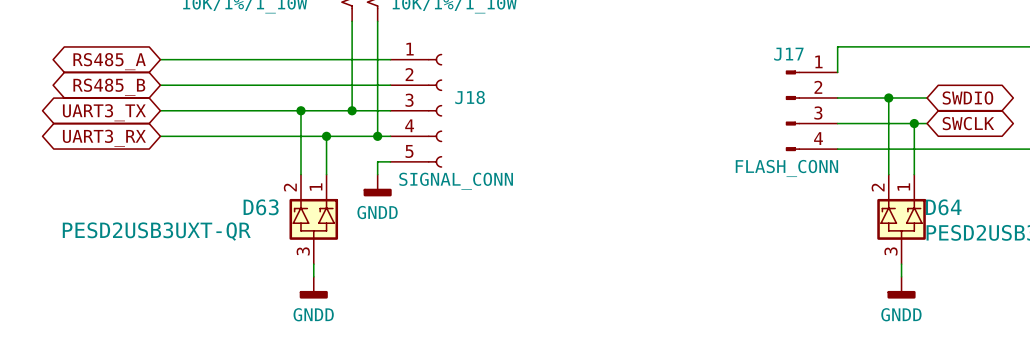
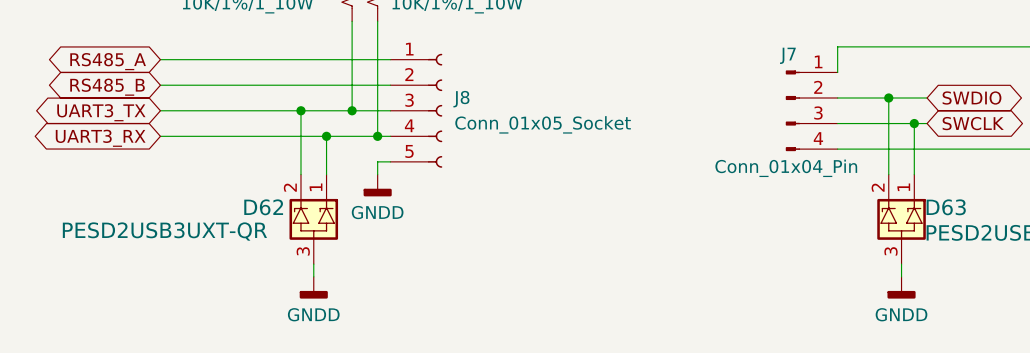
J17 name: J17 (788, 54) -> J7 (787, 55)
J18 name: J18 (470, 97) -> J8 (461, 99)
J17 value: FLASH_CONN (786, 168) -> Conn_01x04_Pin (786, 168)
J18 value: SIGNAL_CONN (456, 181) -> Conn_01x05_Socket (543, 124)
D63 name: D63 (261, 207) -> D62 (263, 207)
D64 name: D64 (943, 207) -> D63 (946, 207)

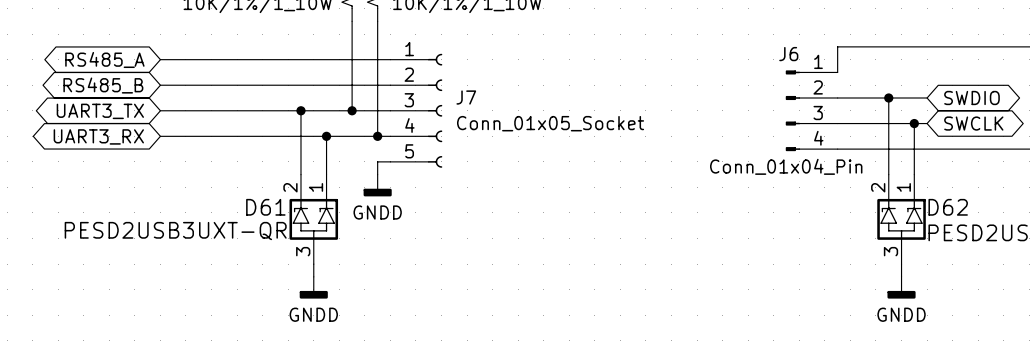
J7 name: J7 (787, 55) -> J6 (788, 54)
J8 name: J8 (461, 99) -> J7 (466, 97)
D62 name: D62 (263, 207) -> D61 (265, 207)
D63 name: D63 (946, 207) -> D62 (948, 207)

